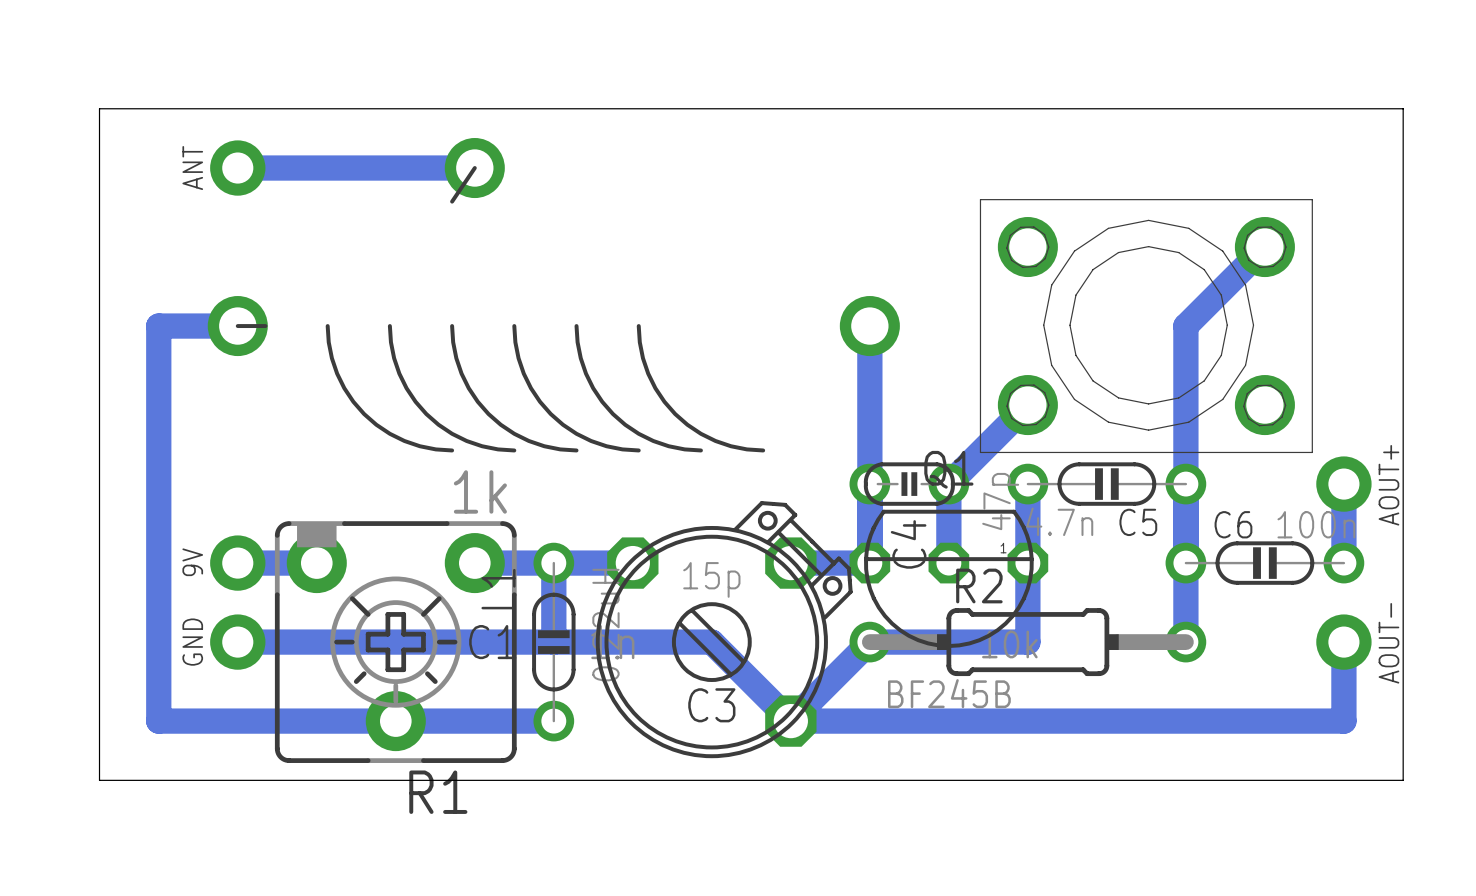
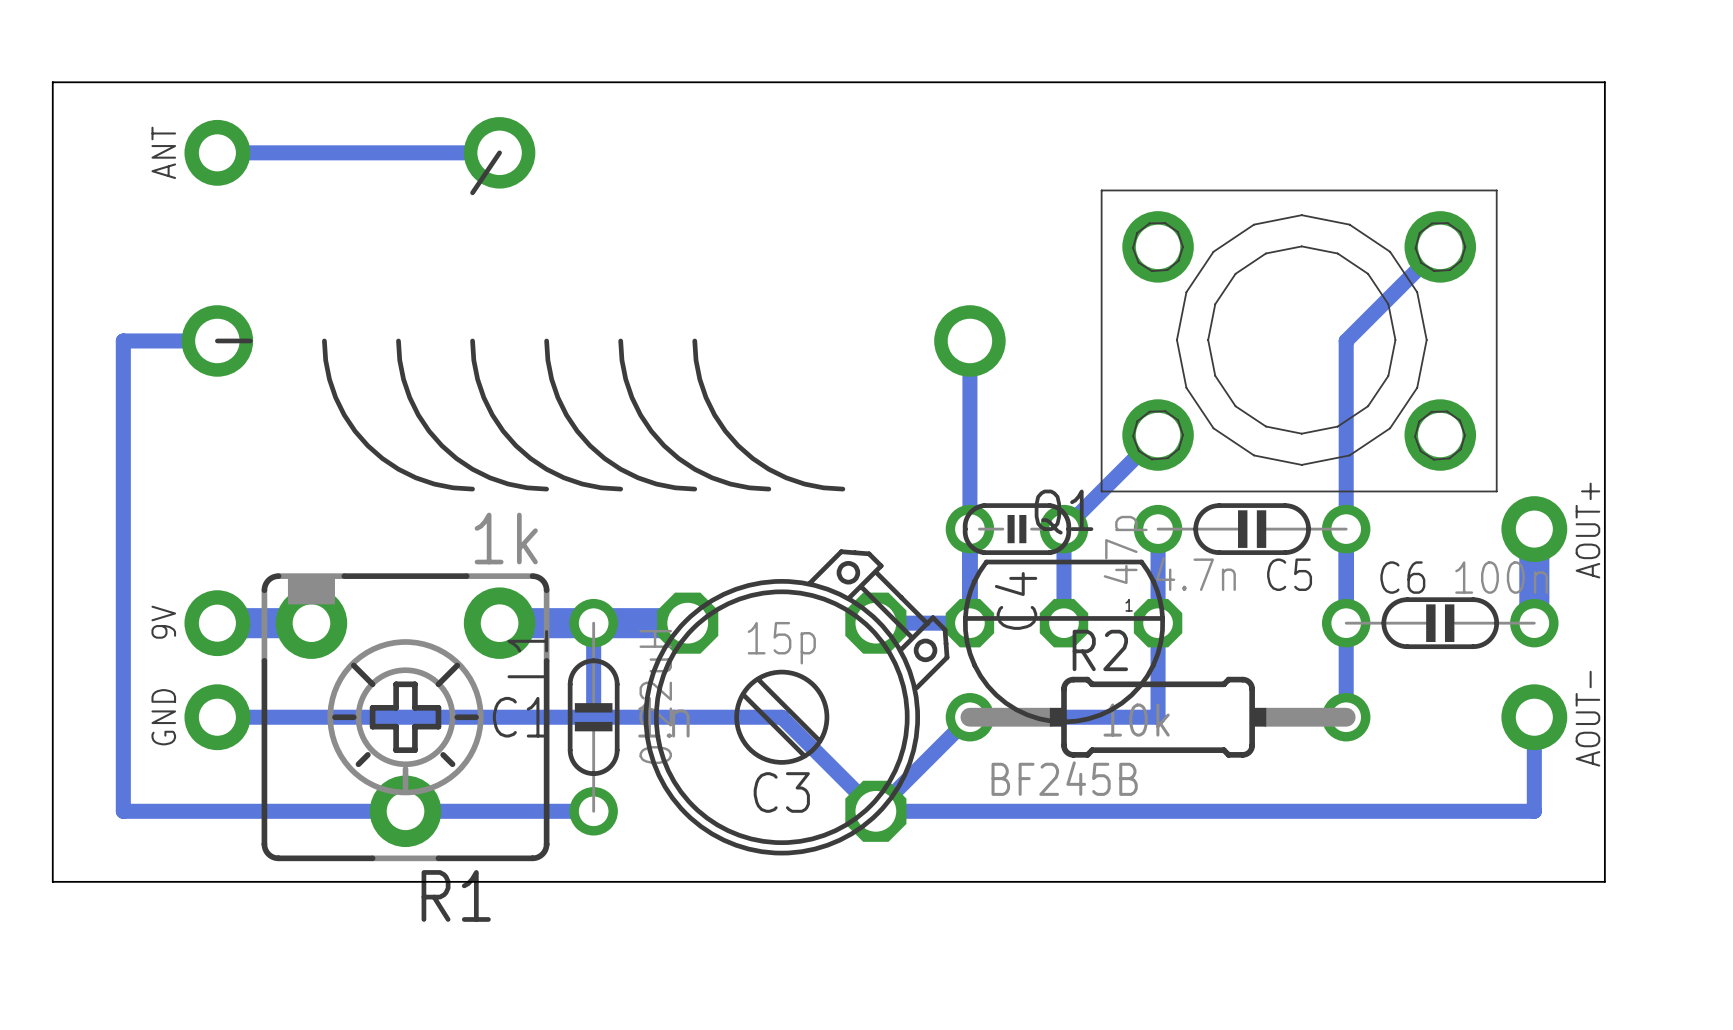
bottom track width: thick (237, 168) (474, 168) -> thin (217, 152) (499, 152)
bottom track width: thick (1264, 247) (1185, 326) (1185, 642) -> thin (1440, 246) (1346, 340) (1346, 717)
bottom track width: thick (237, 326) (158, 326) (158, 721) (553, 721) -> thin (217, 340) (123, 340) (123, 811) (593, 811)
bottom track width: thick (869, 326) (869, 563) (790, 563) -> thin (969, 340) (969, 623) (875, 623)
bottom track width: thick (1027, 405) (948, 484) (948, 563) -> thin (1158, 435) (1063, 529) (1063, 623)
bottom track width: thick (1027, 484) (1027, 642) (869, 642) (790, 721) -> thin (1158, 529) (1158, 717) (969, 717) (875, 811)
bottom track width: thick (553, 563) (553, 642) -> thin (593, 623) (593, 717)
bottom track width: thick (237, 642) (711, 642) (790, 721) -> thin (217, 717) (781, 717) (875, 811)
bottom track width: thick (1343, 642) (1343, 721) (790, 721) -> thin (1534, 717) (1534, 811) (875, 811)

